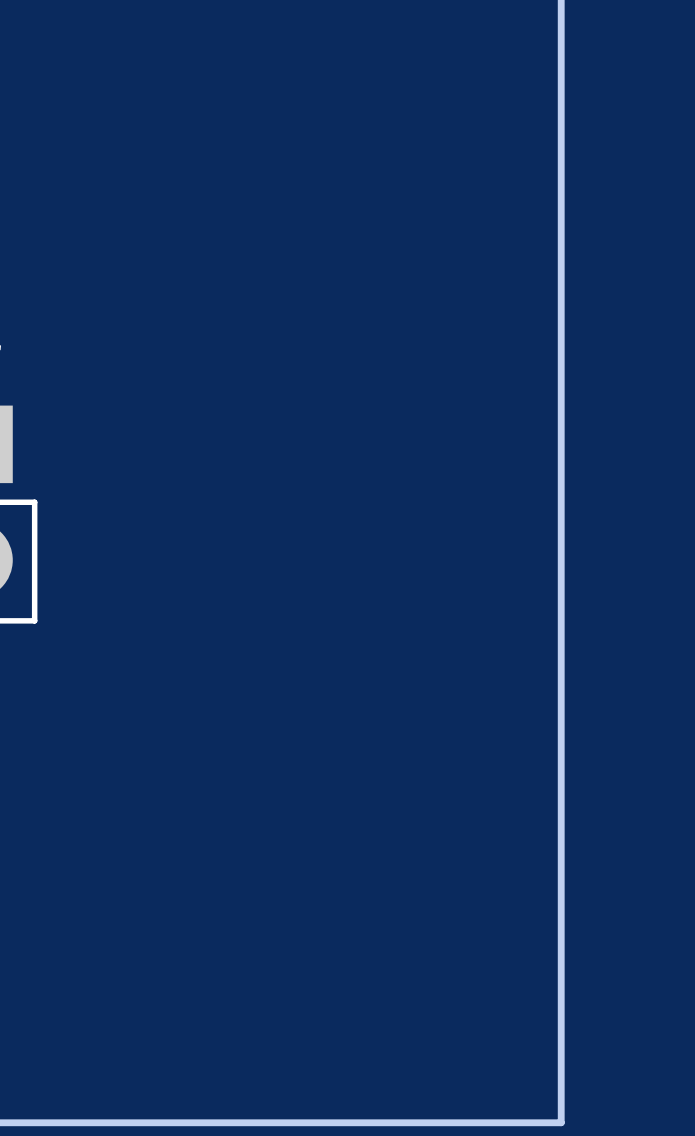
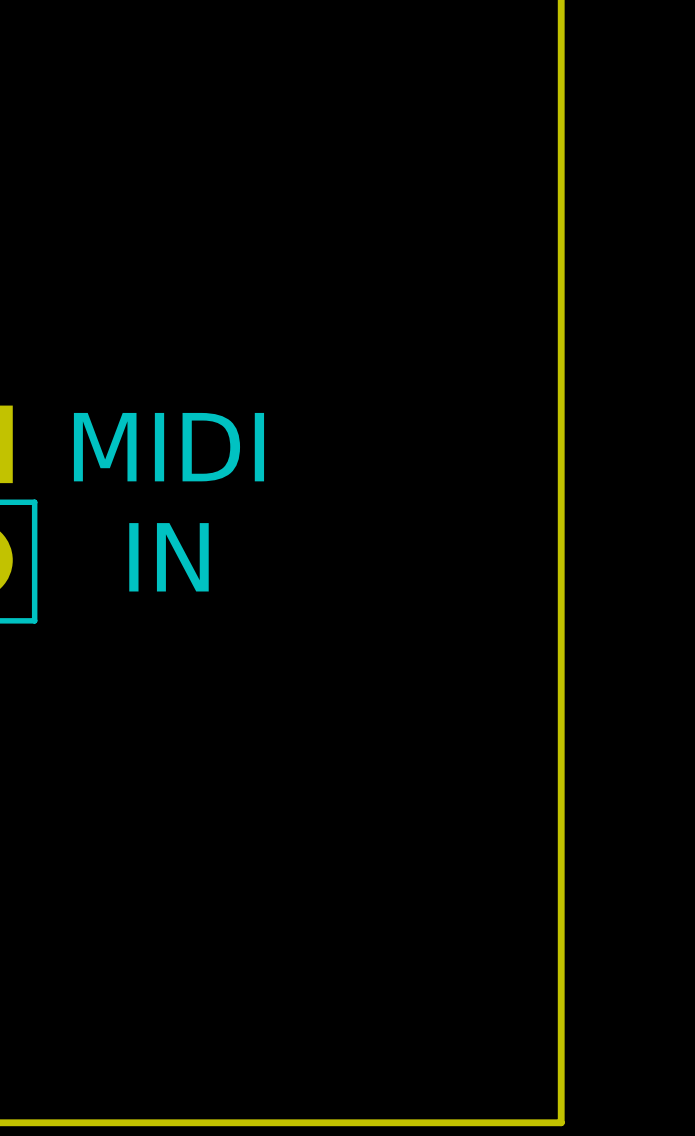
text: none -> MIDI (168, 447)
text: none -> IN (168, 557)

